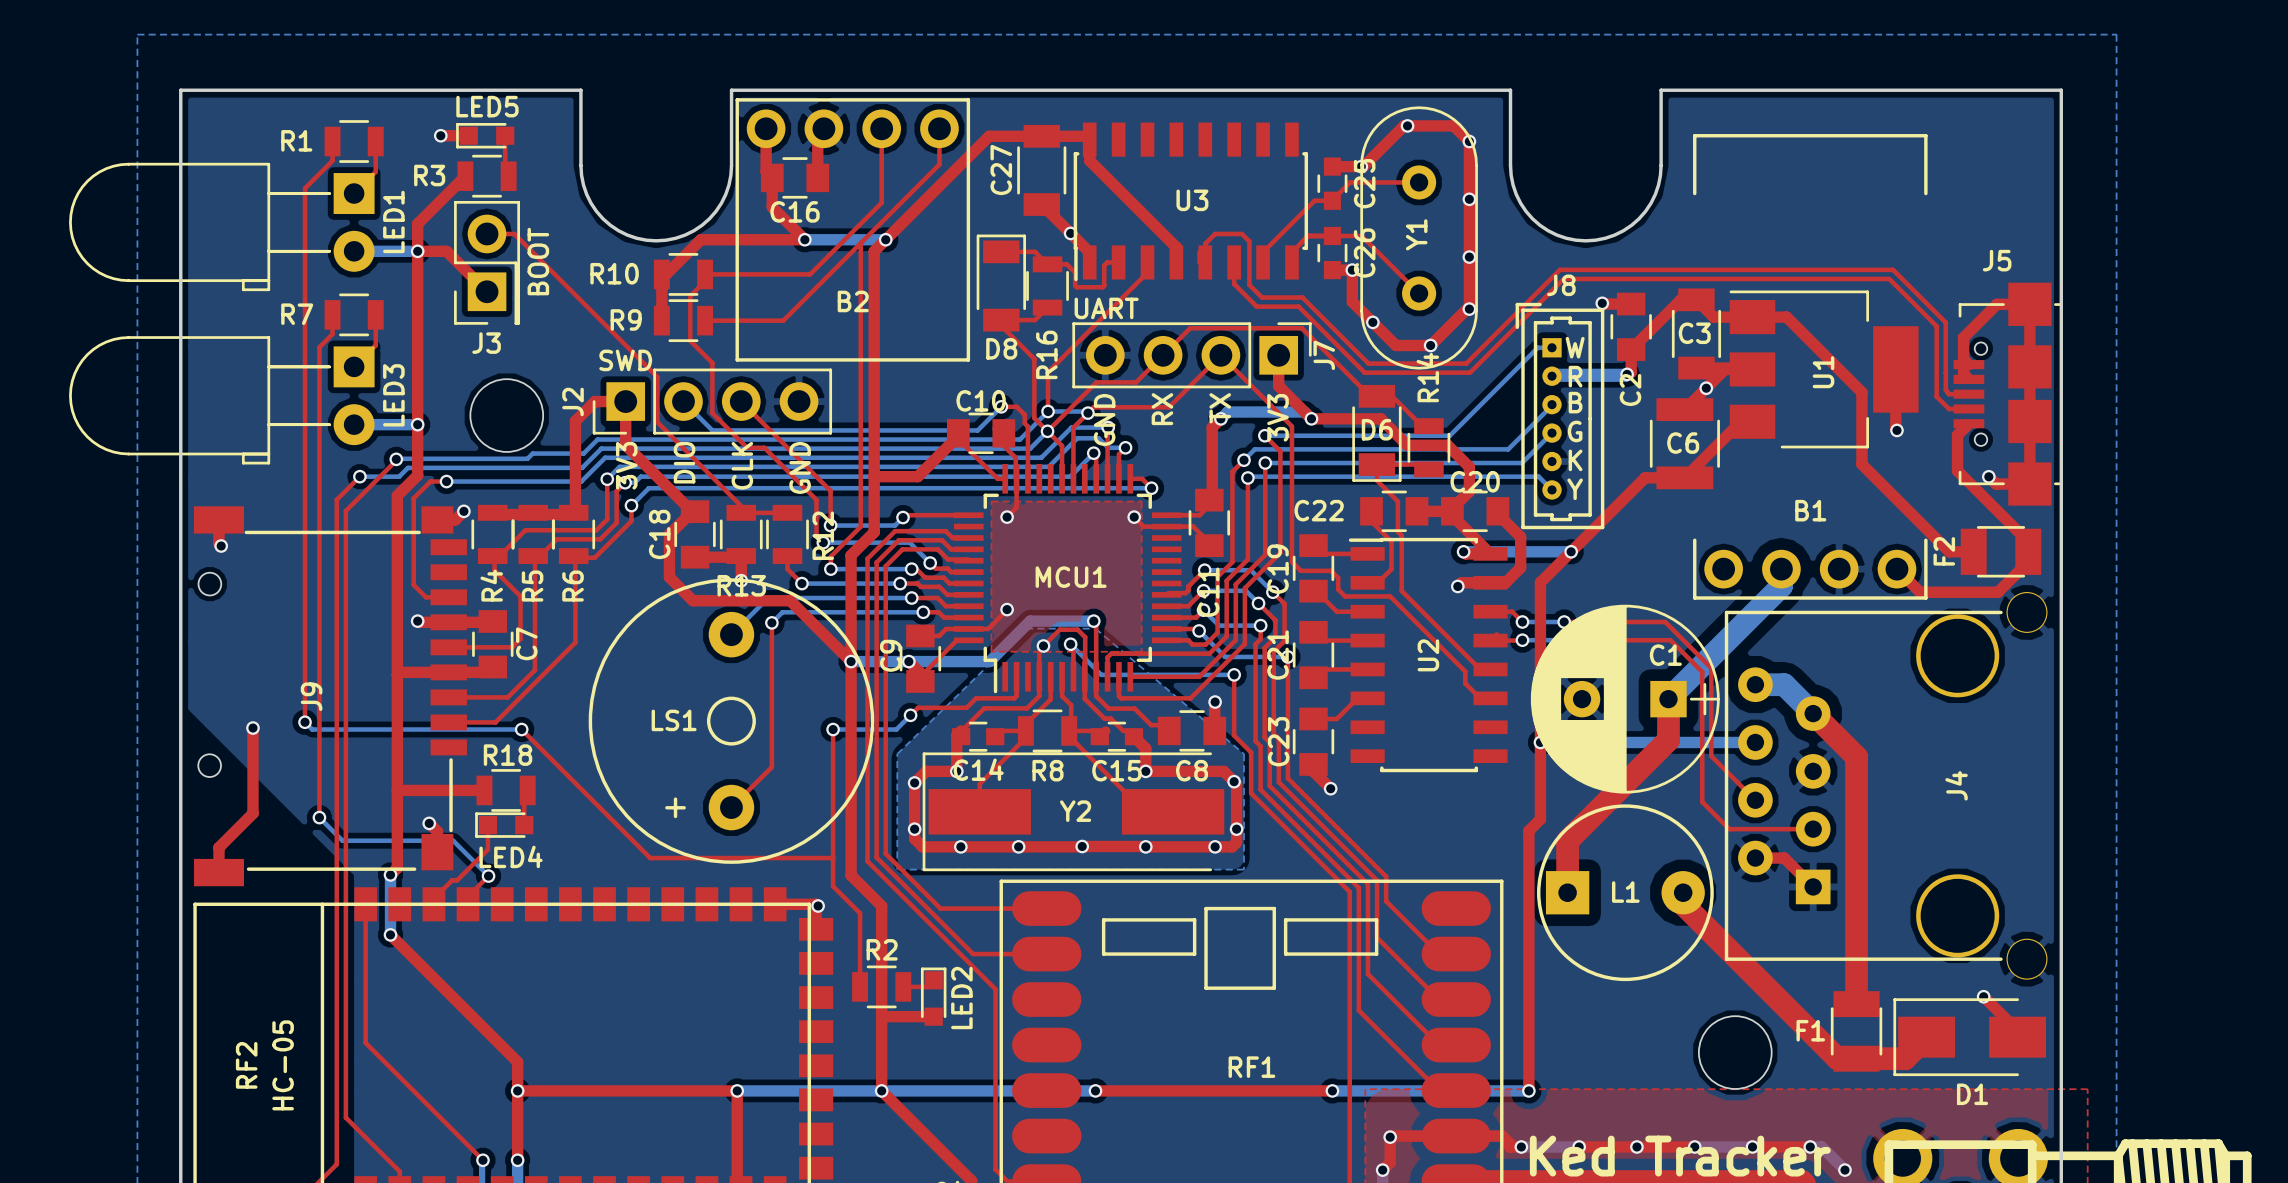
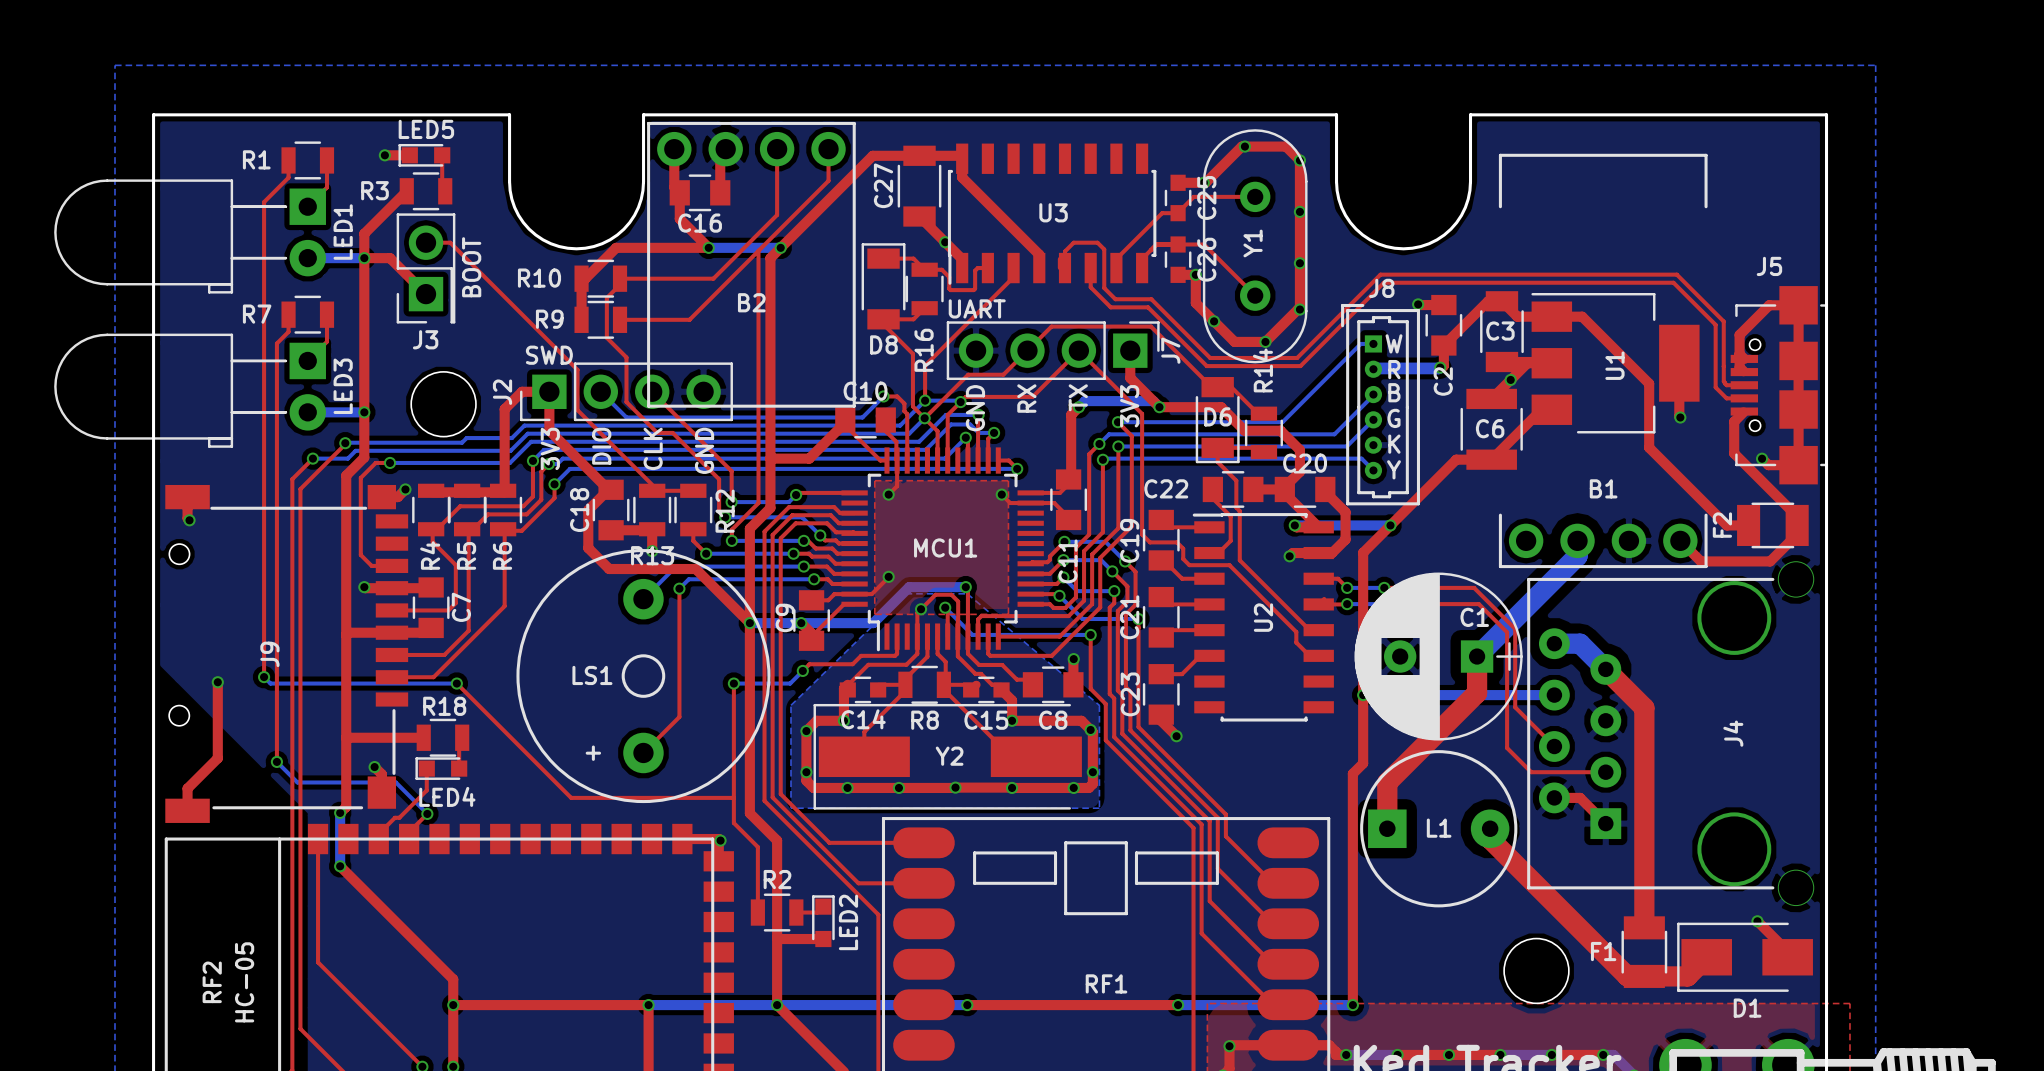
B2 footprint: [735, 98, 971, 362] -> [647, 121, 856, 408]
LS1 footprint: [588, 578, 875, 864] -> [516, 549, 771, 804]

